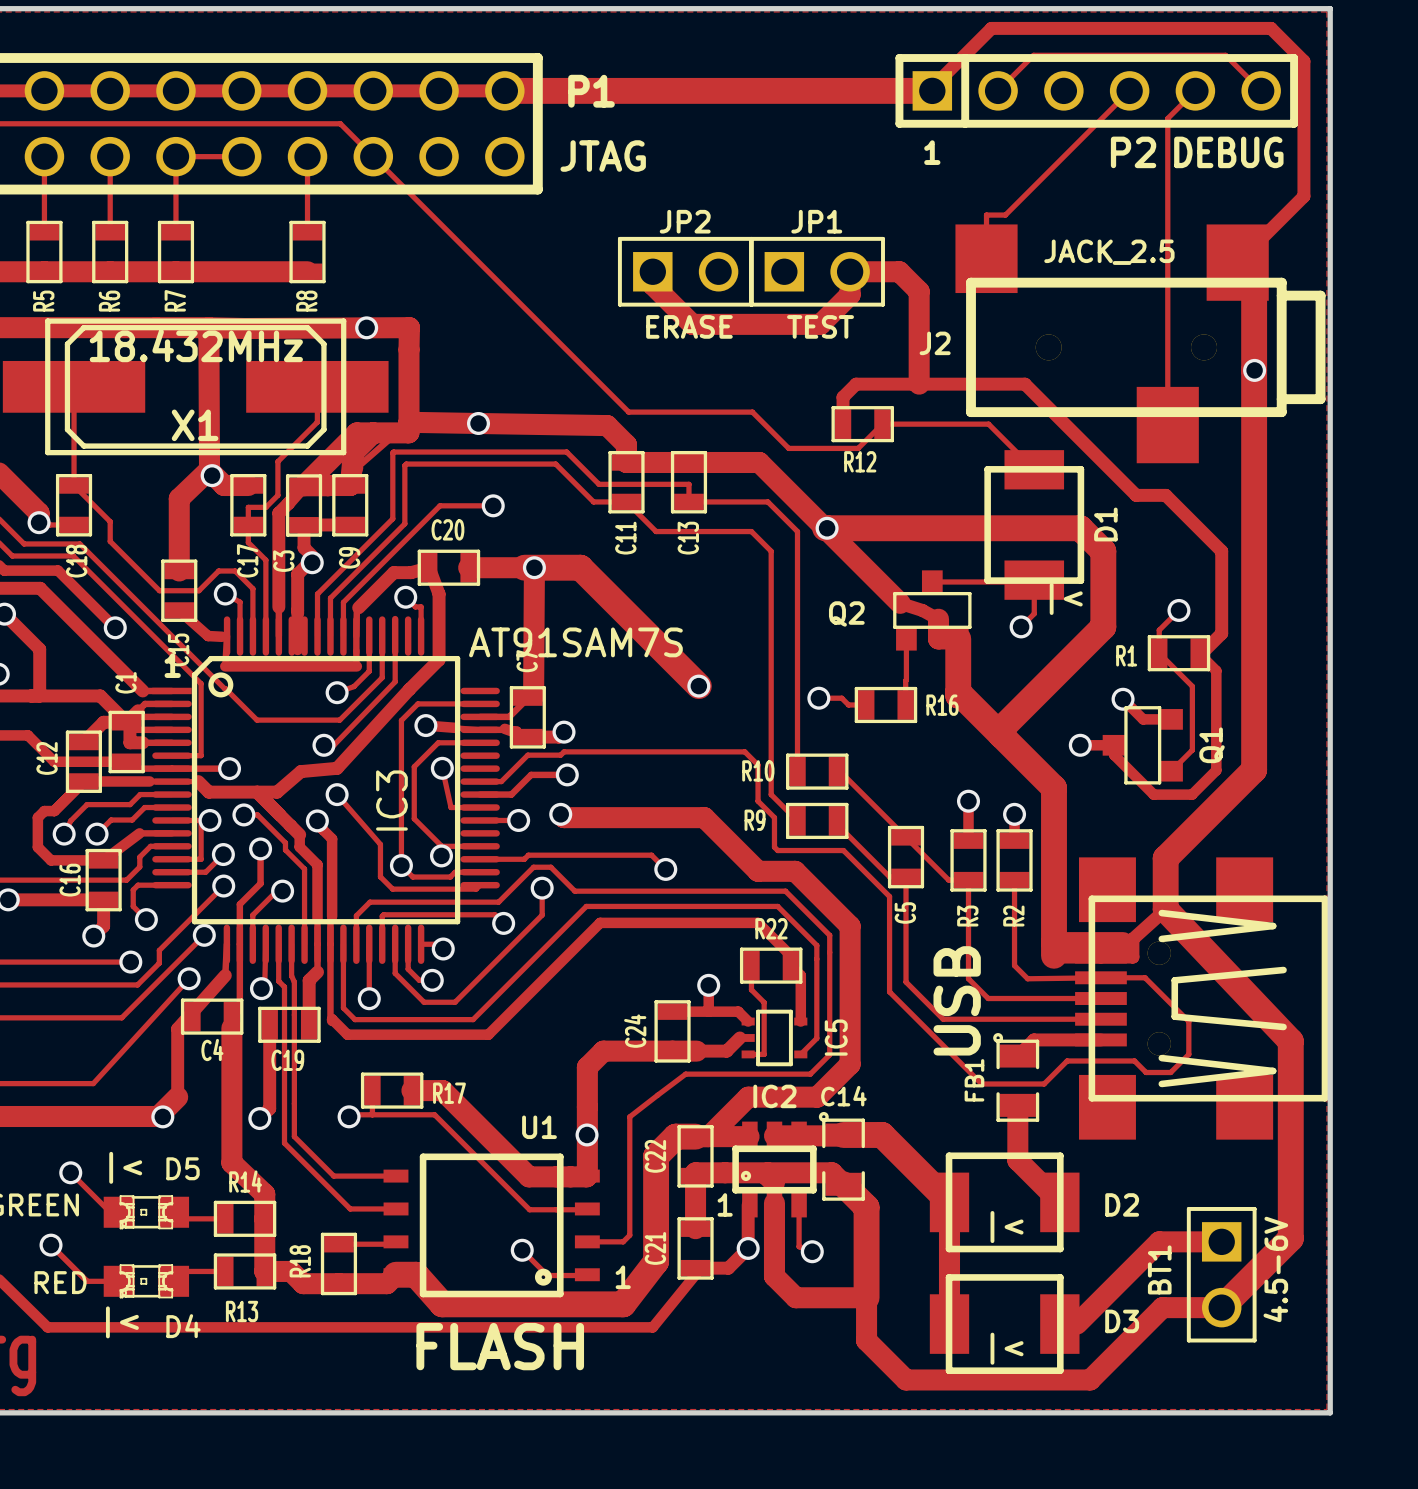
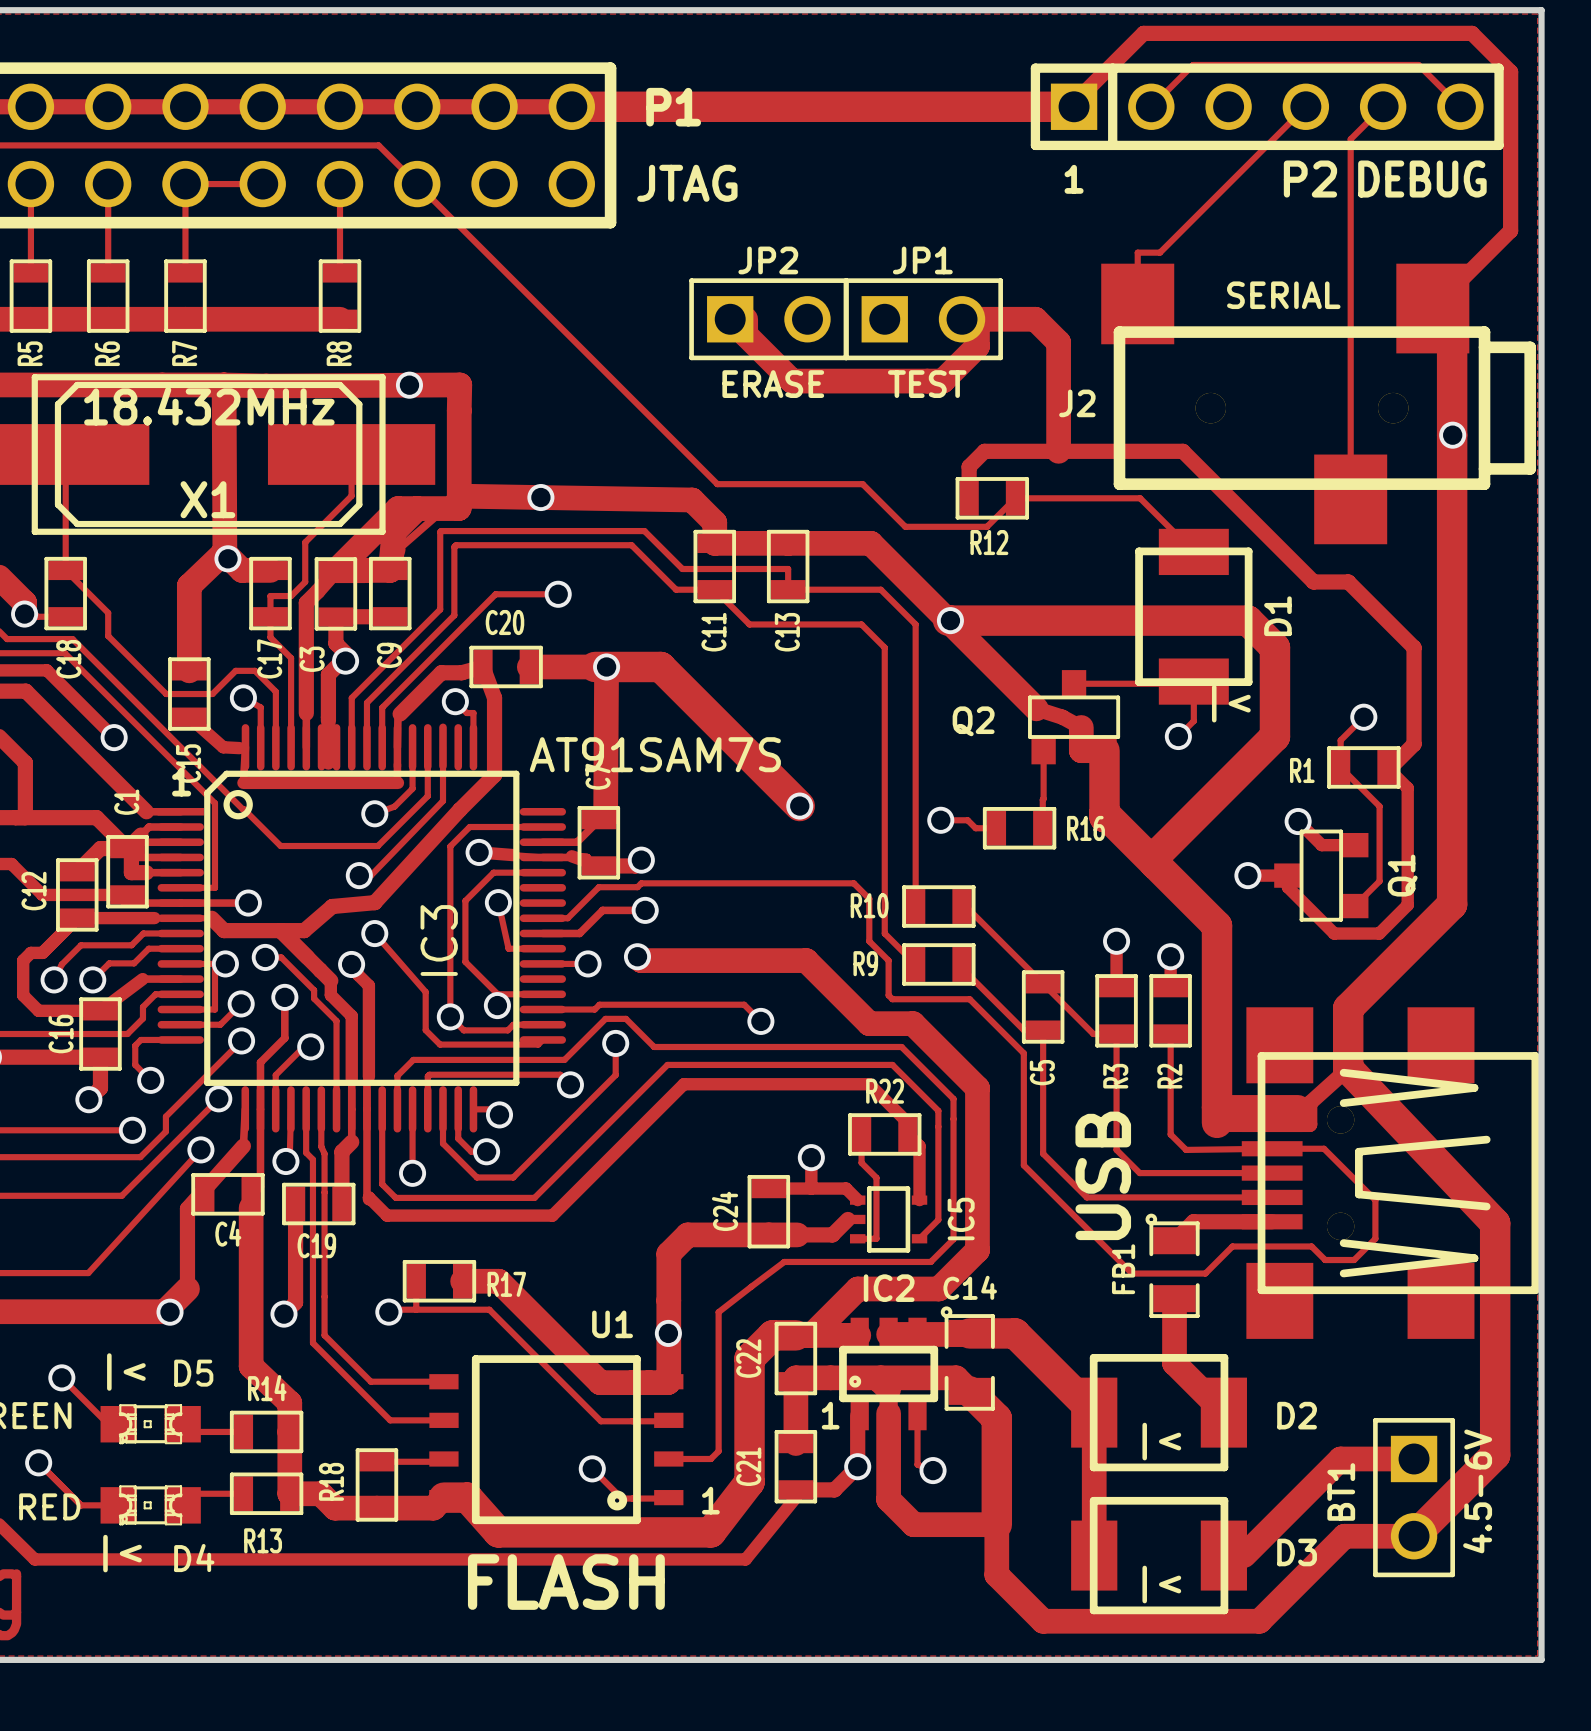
J2 value: JACK_2.5 (1109, 252) -> SERIAL (1283, 295)
JP2 position: (685, 271) -> (768, 319)
JP1 position: (817, 271) -> (923, 319)

